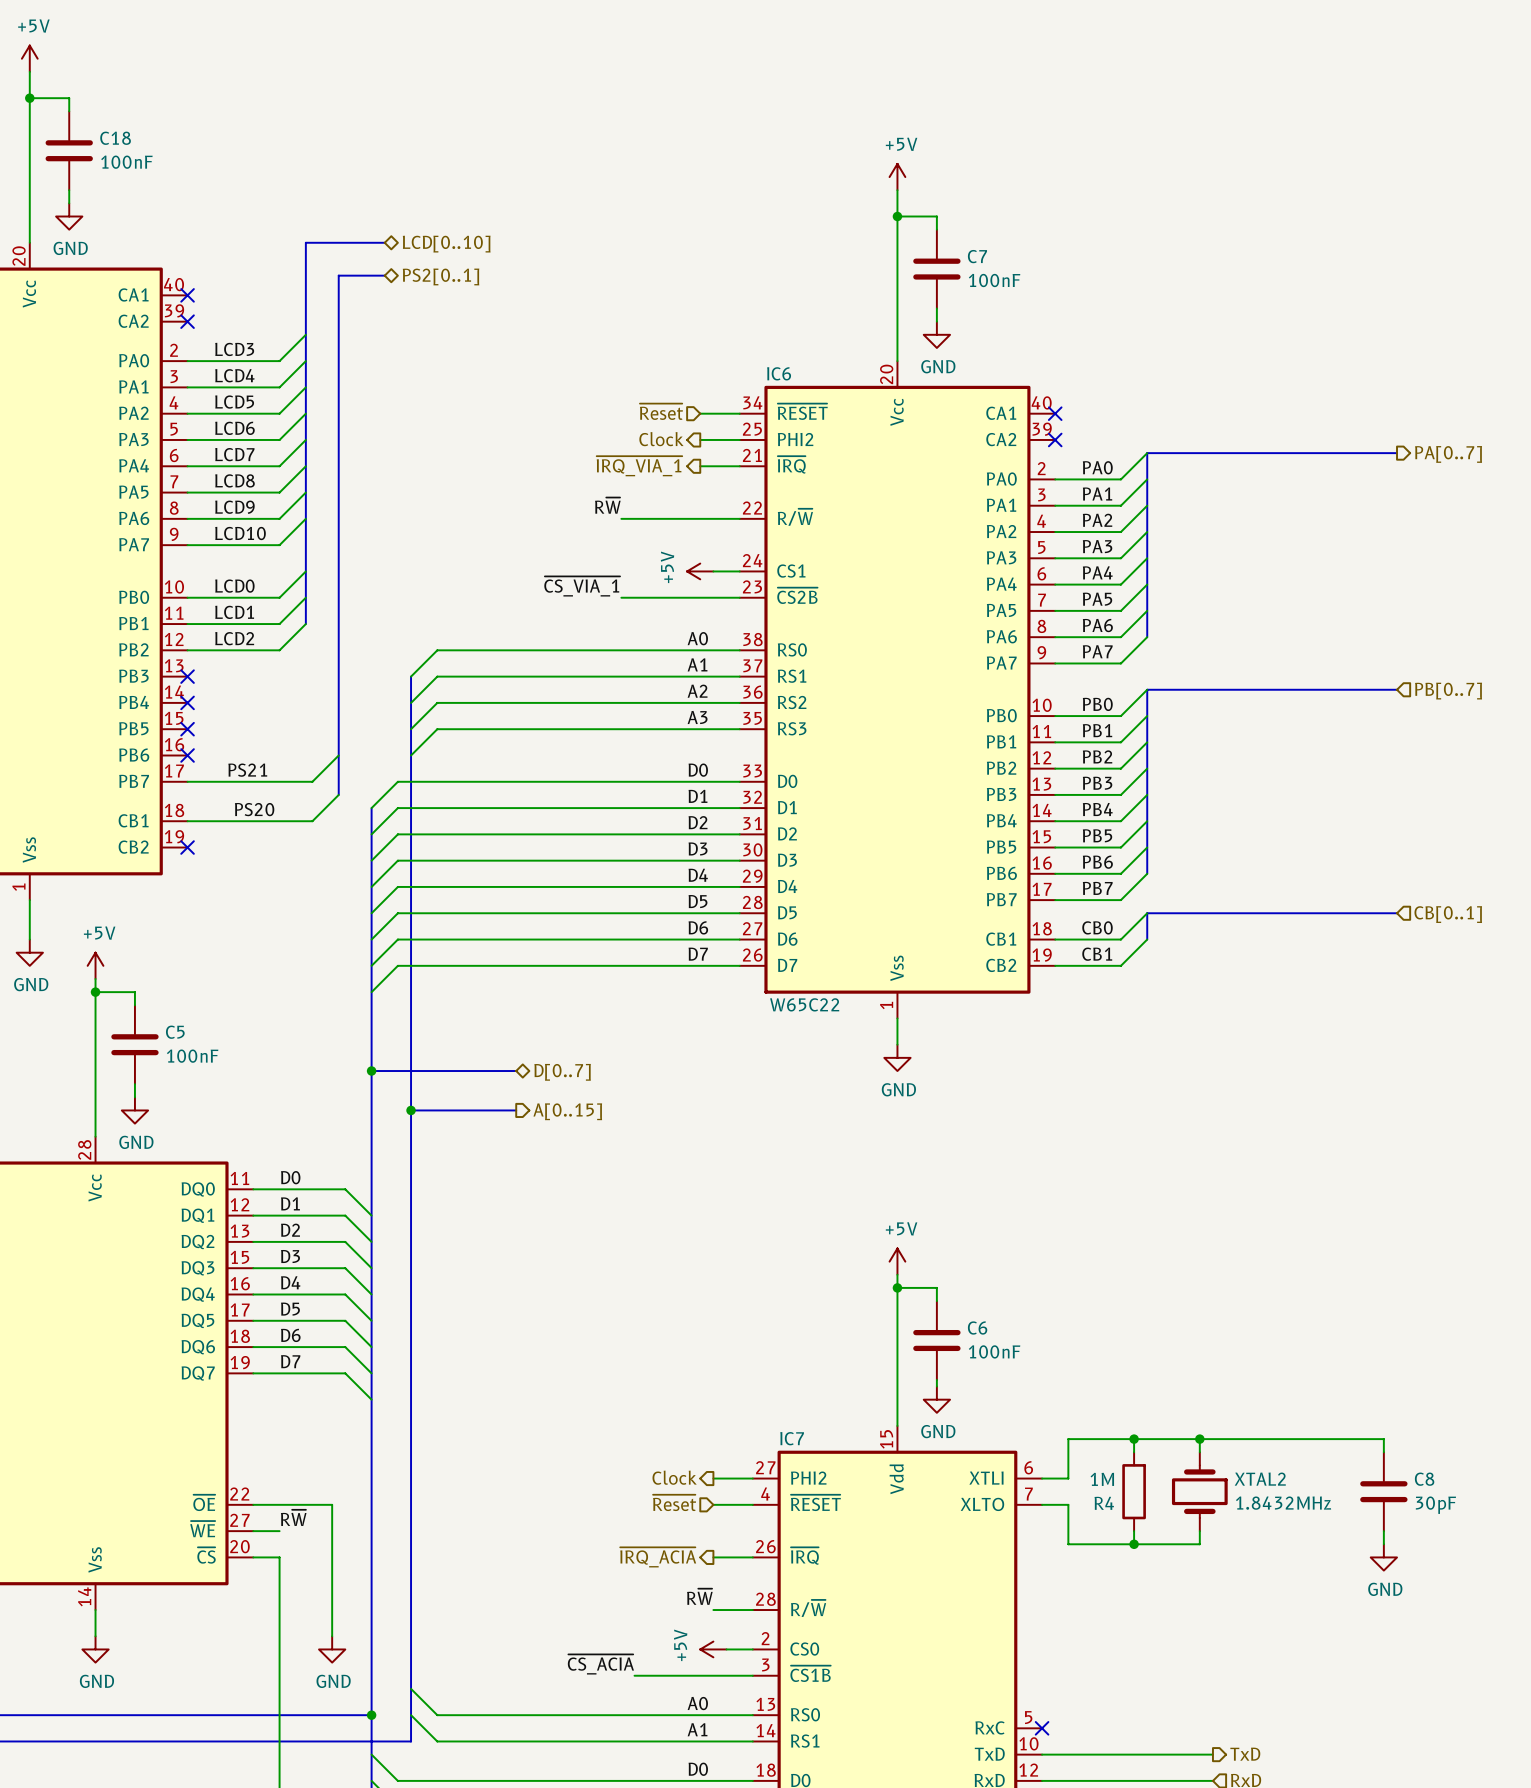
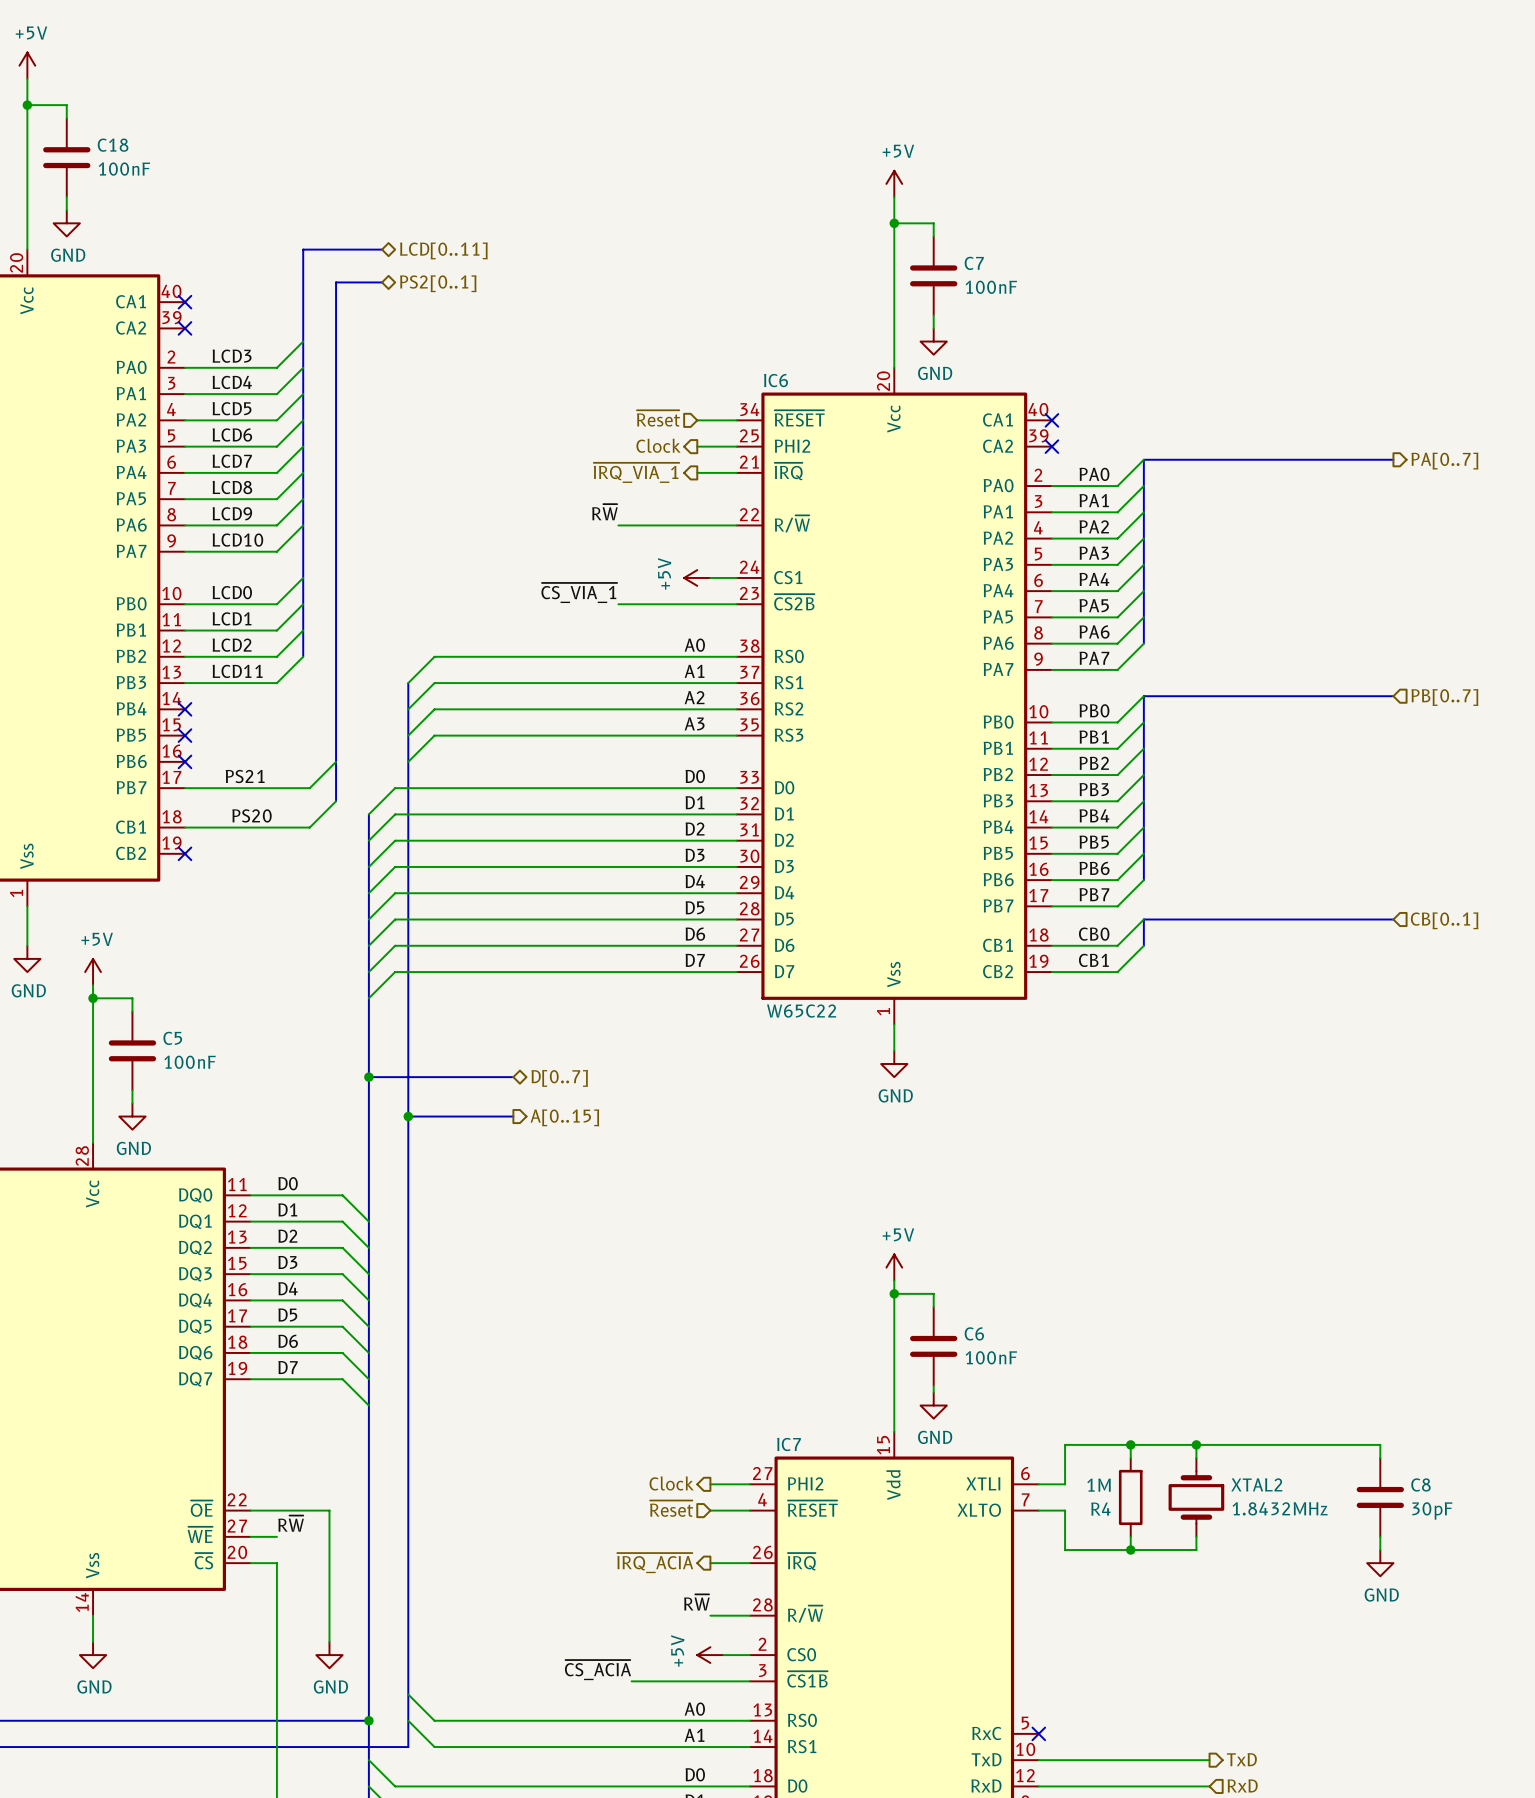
hierarchical label: LCD[0..10] (446, 244) -> LCD[0..11] (443, 250)
bus: none -> (303, 630) (303, 656)
wire: none -> (303, 656) (276, 683) (184, 683)
label: none -> LCD11 (237, 671)
no-connect mark: (187, 676) -> none

